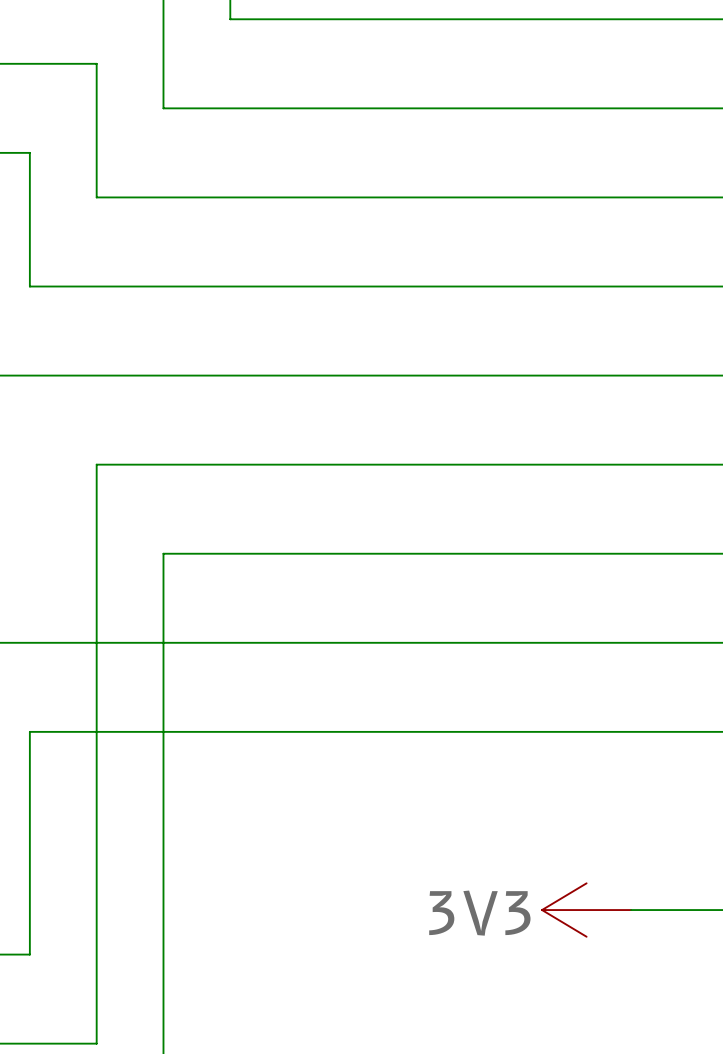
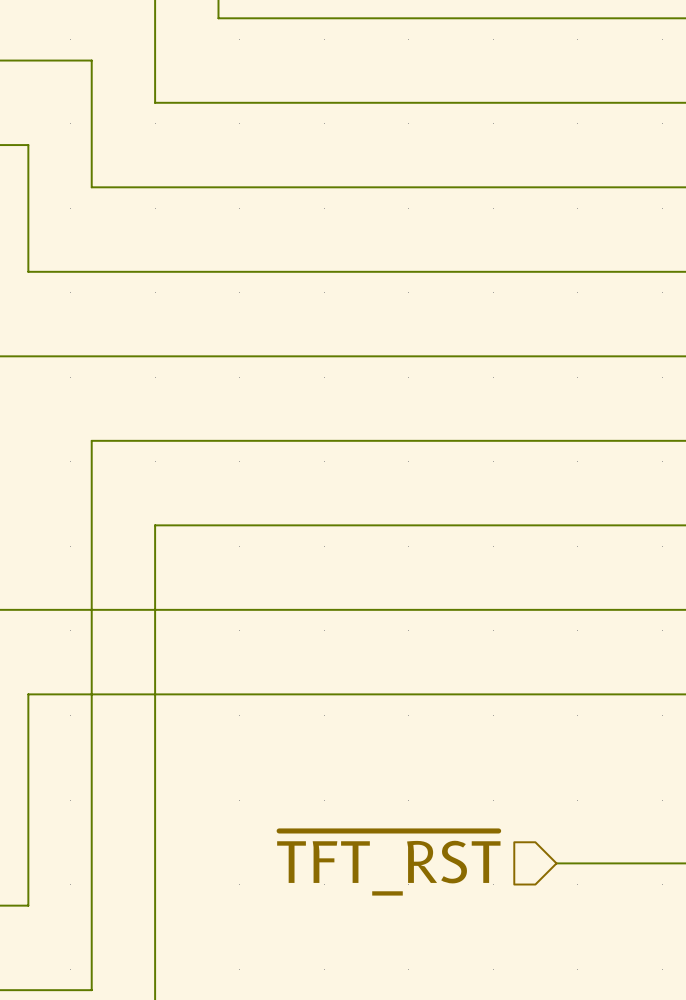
hierarchical label: none -> ~{TFT_RST} (388, 863)
power symbol: 3V3 (586, 910) -> none

